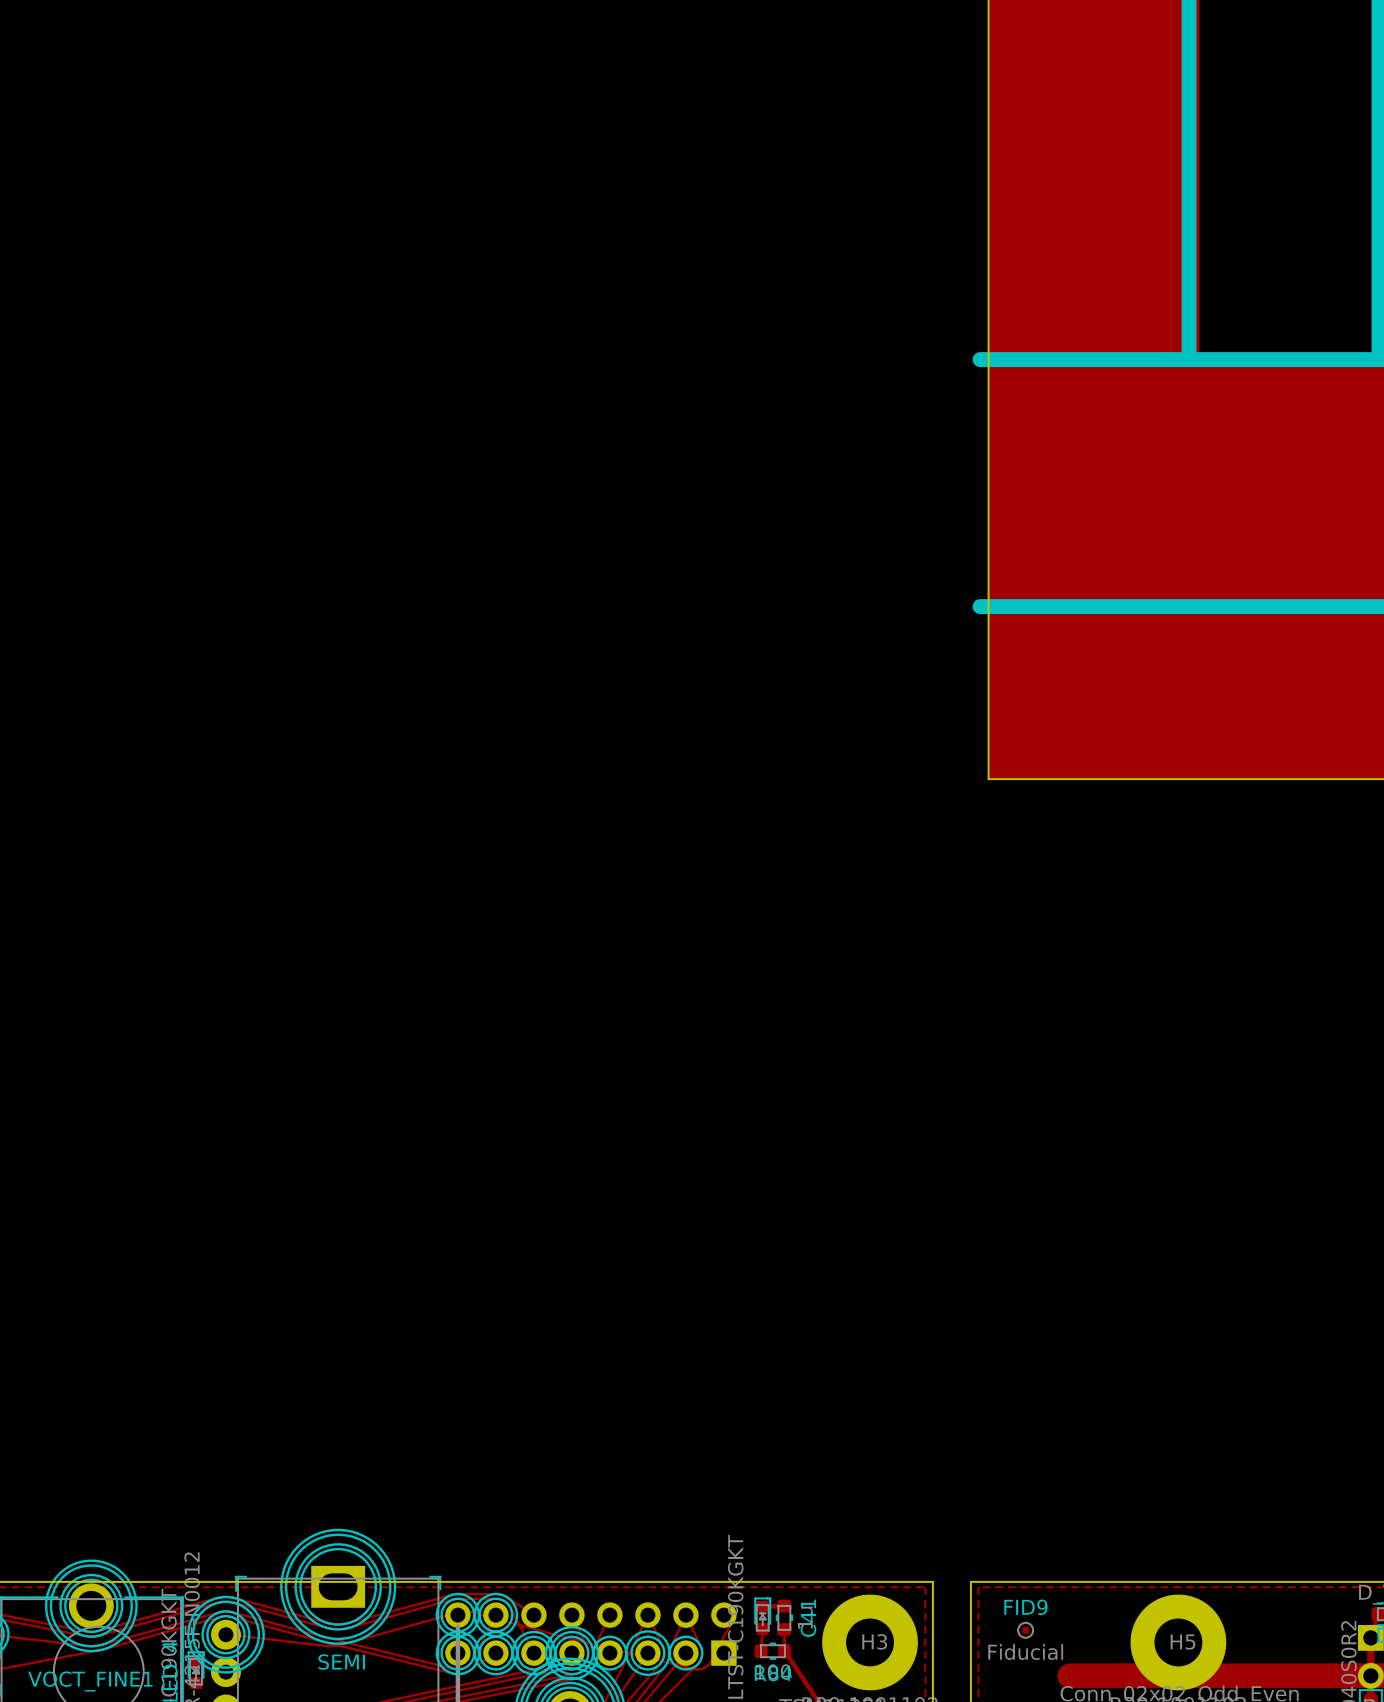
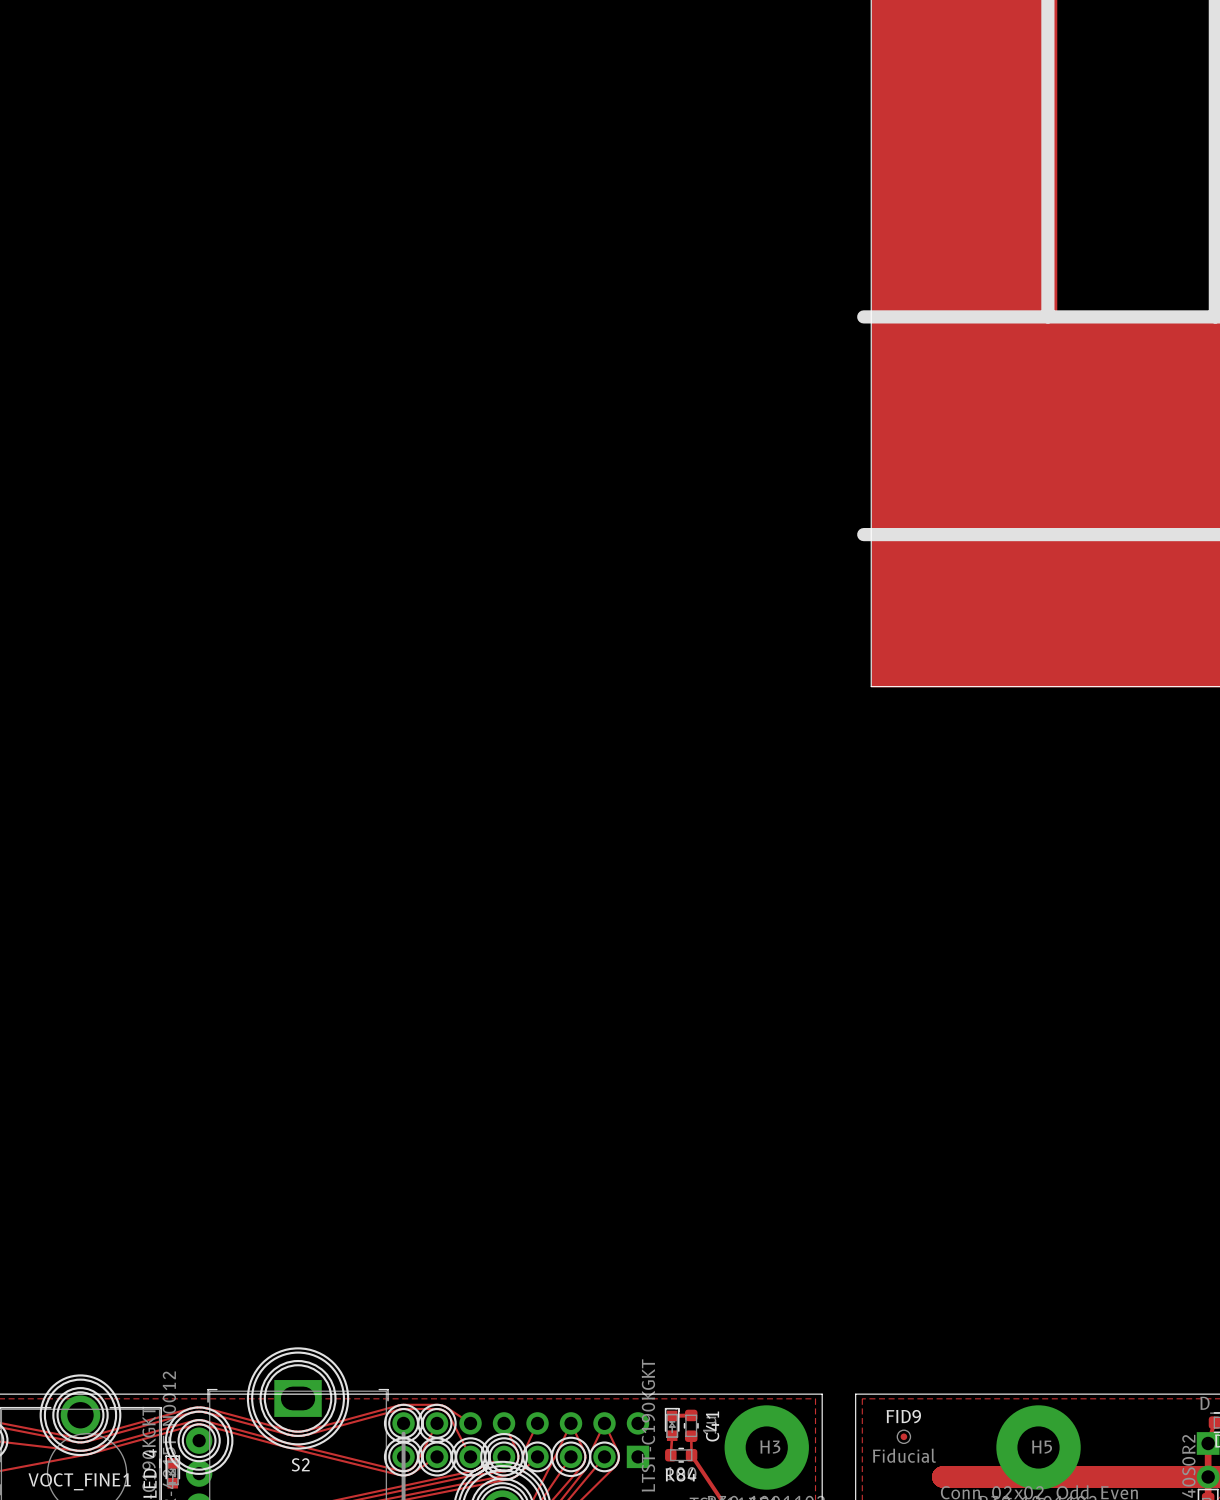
track: (735, 1615) (710, 1663) (699, 1669) (565, 1637) -> none
track: (225, 1634) (333, 1646) (465, 1611) (564, 1637) -> none
SEMI name: SEMI (341, 1662) -> S2 (300, 1464)

